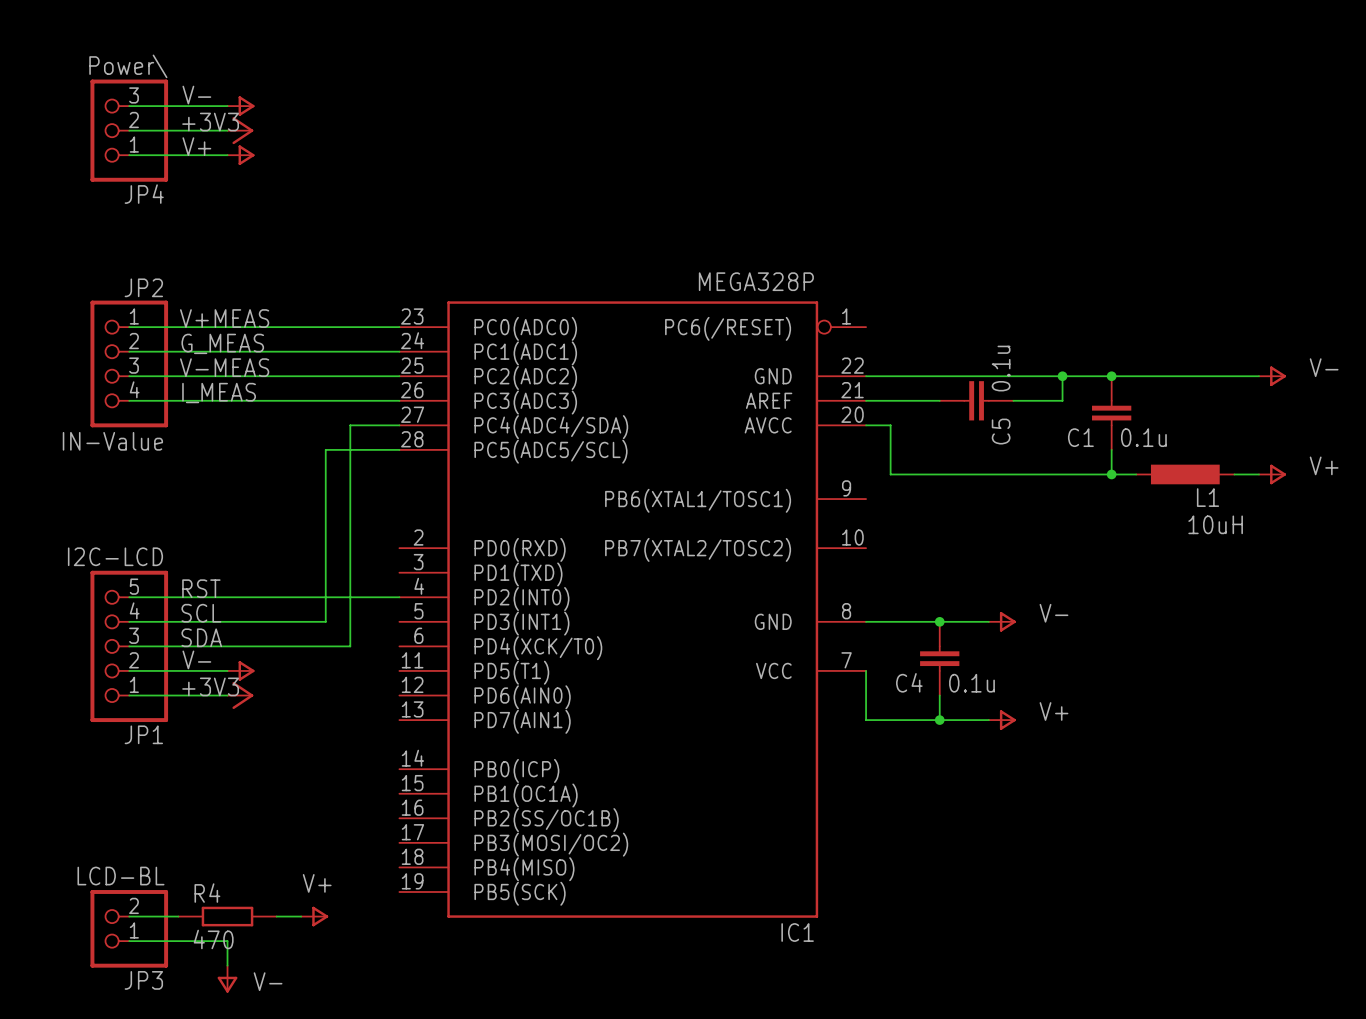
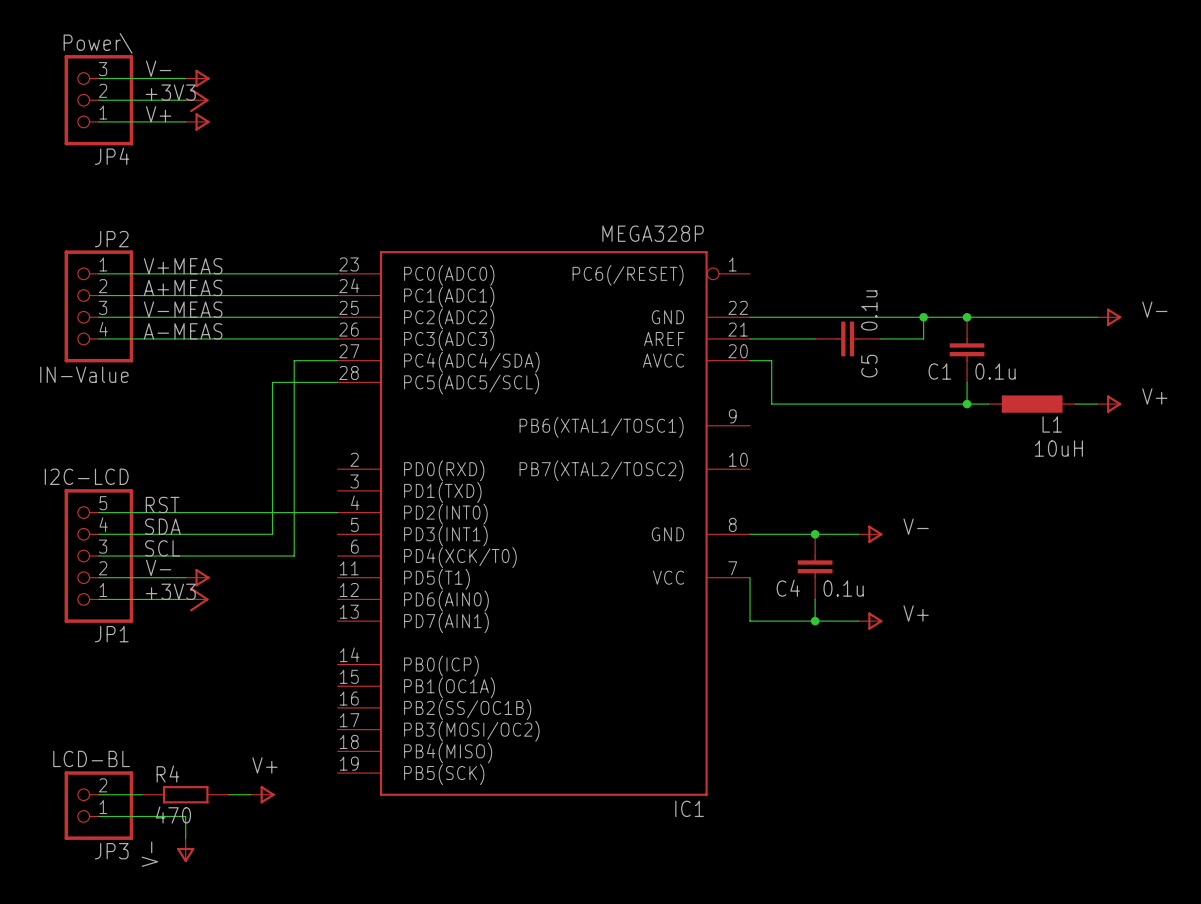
label: G_MEAS (222, 343) -> A+MEAS (183, 287)
label: I_MEAS (219, 393) -> A-MEAS (183, 331)
label: SCL (201, 613) -> SDA (162, 526)
label: SDA (201, 637) -> SCL (162, 548)
power symbol text rotation: 0° (268, 981) -> 90° counterclockwise (149, 854)
power symbol text position: V- (268, 981) -> V- (149, 854)

